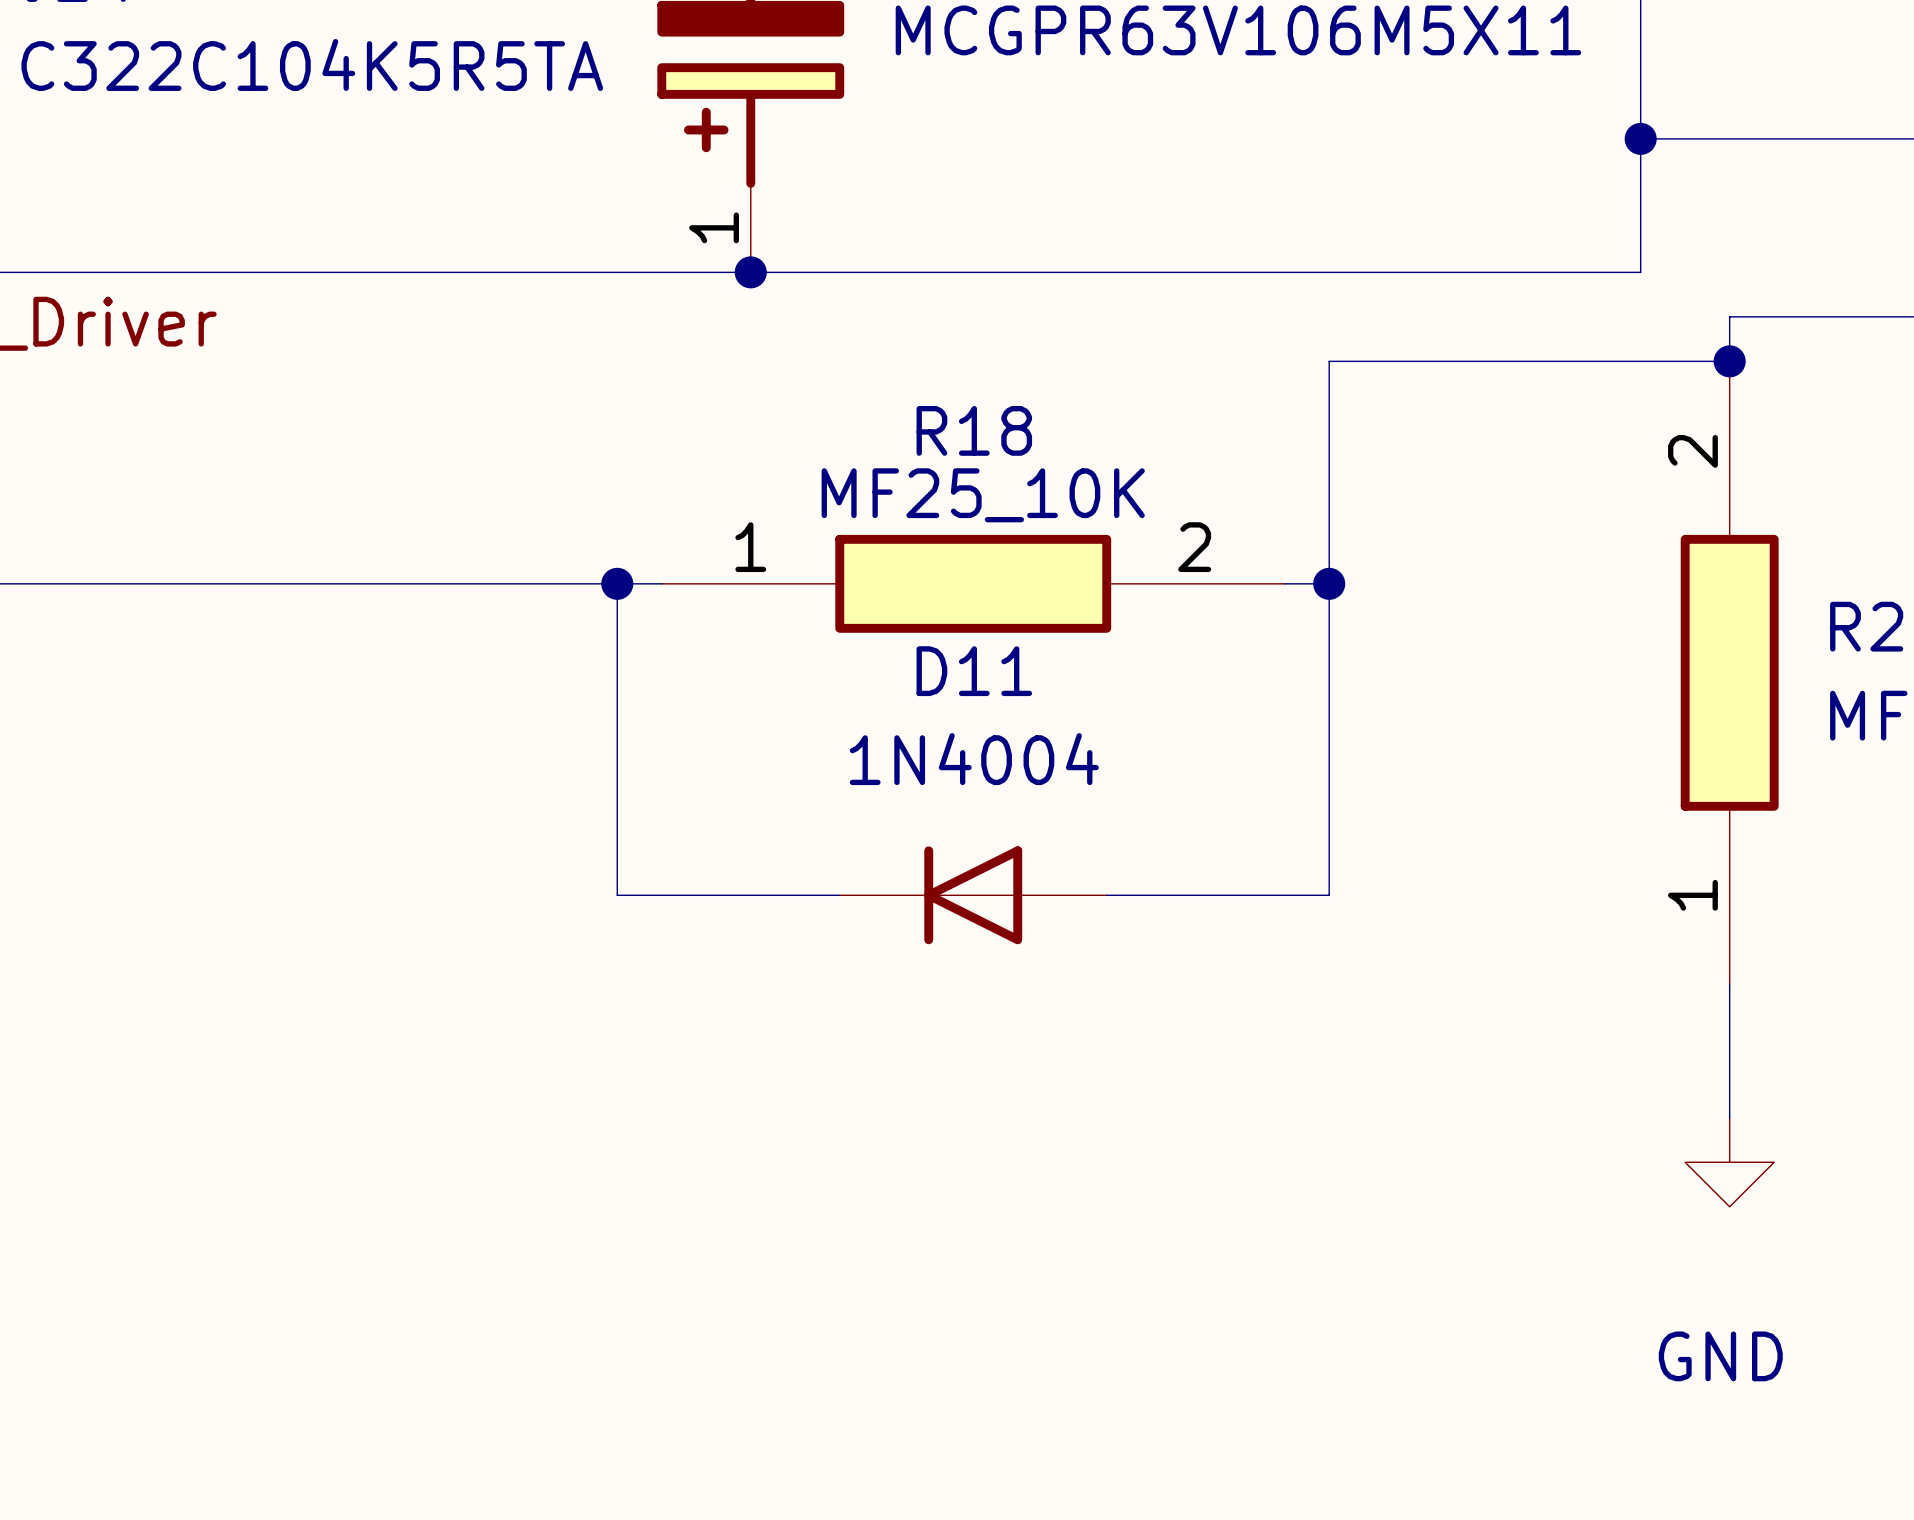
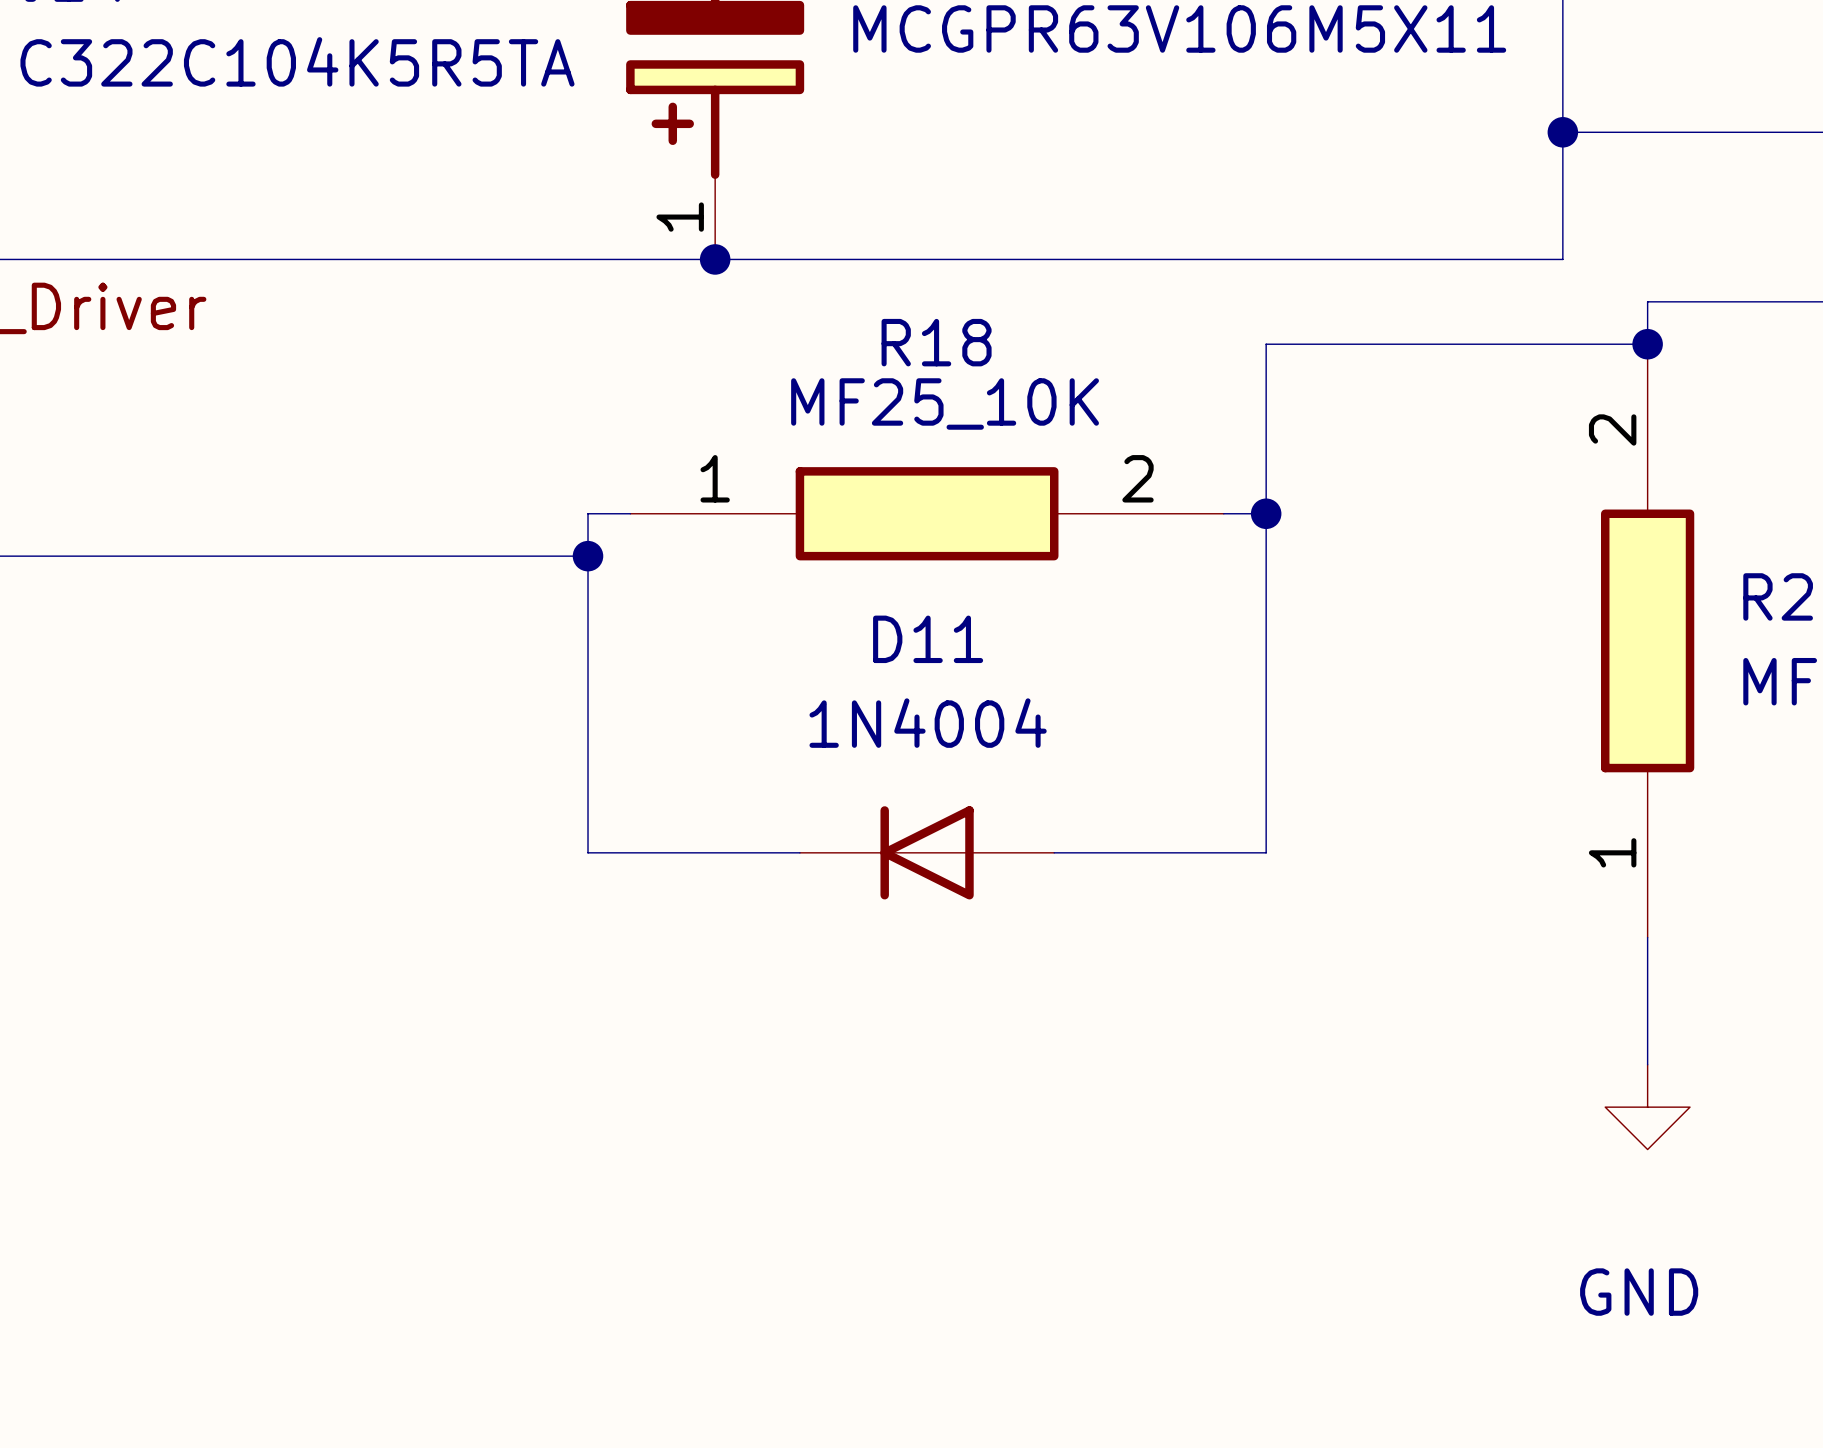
R18 name position: R18 (974, 430) -> R18 (936, 342)
R18 value position: MF25_10K (983, 495) -> MF25_10K (945, 403)
wire: (617, 583) (661, 583) -> (588, 556) (588, 513) (630, 513)
R18 position: (973, 583) -> (927, 513)
wire: (1284, 583) (1329, 583) -> (1223, 513) (1266, 513)
junction position: (1329, 583) -> (1266, 513)

